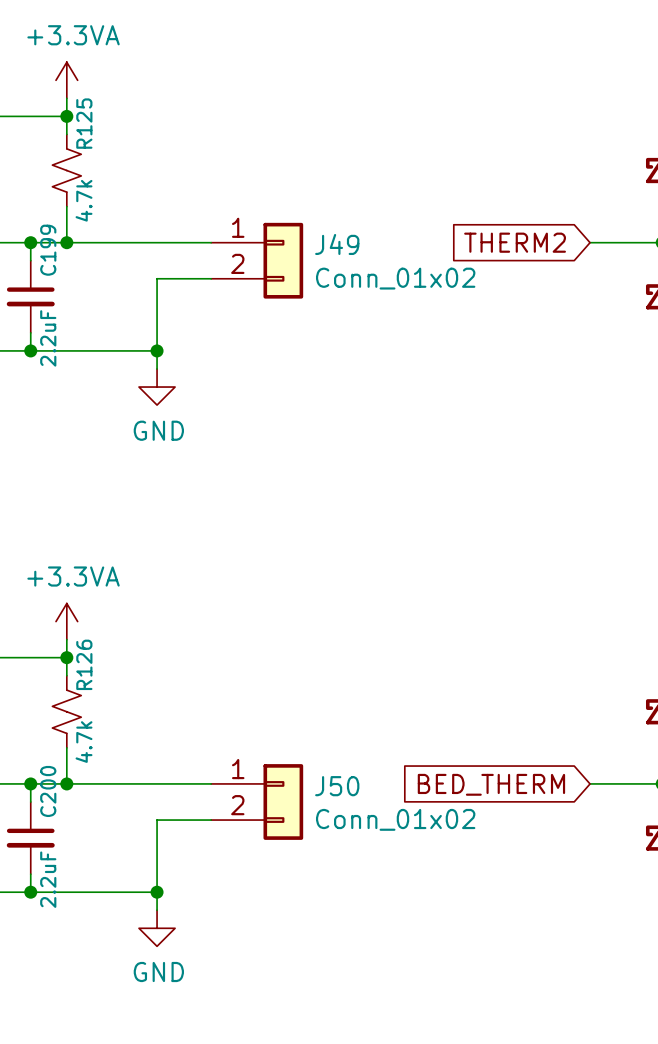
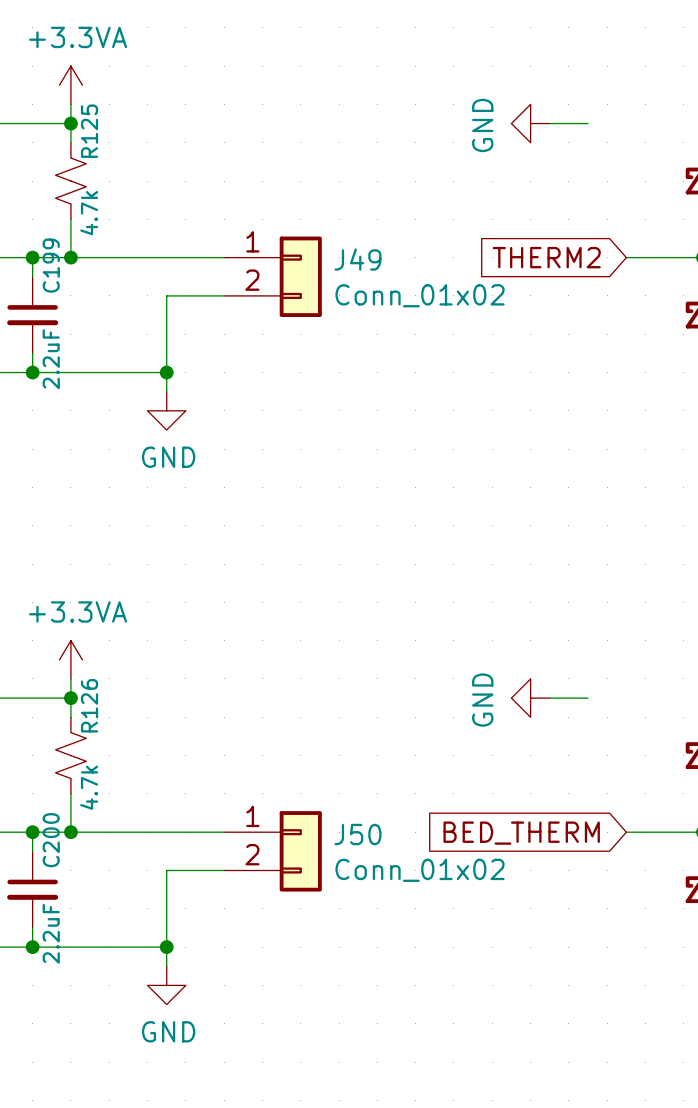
power symbol: none -> GND (530, 123)
wire: none -> (549, 123) (588, 123)
power symbol: none -> GND (530, 698)
wire: none -> (549, 698) (588, 698)

